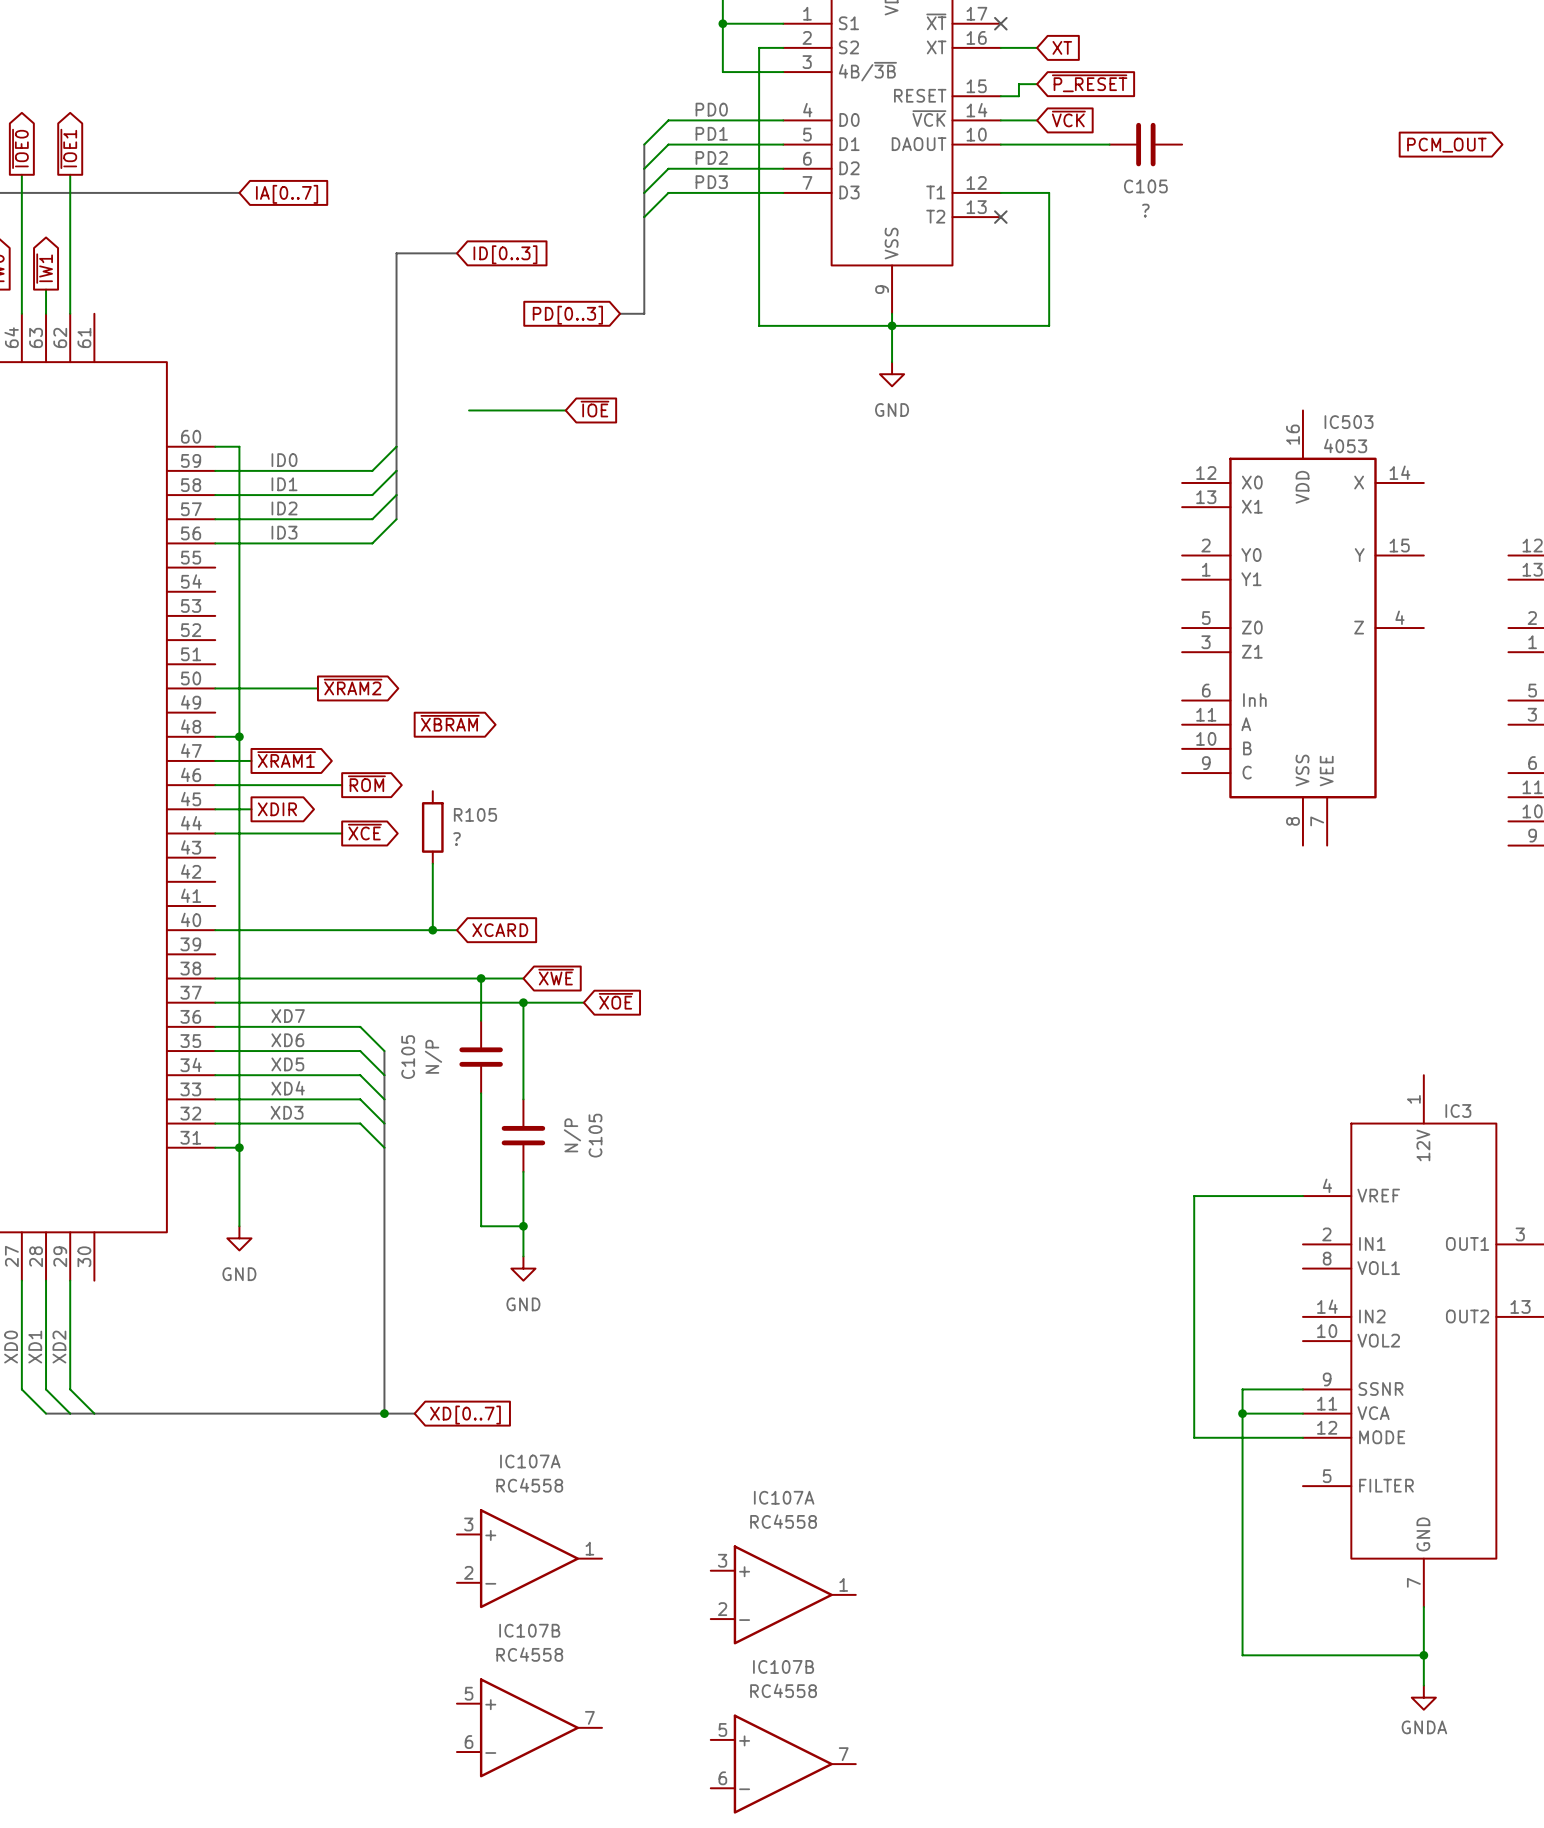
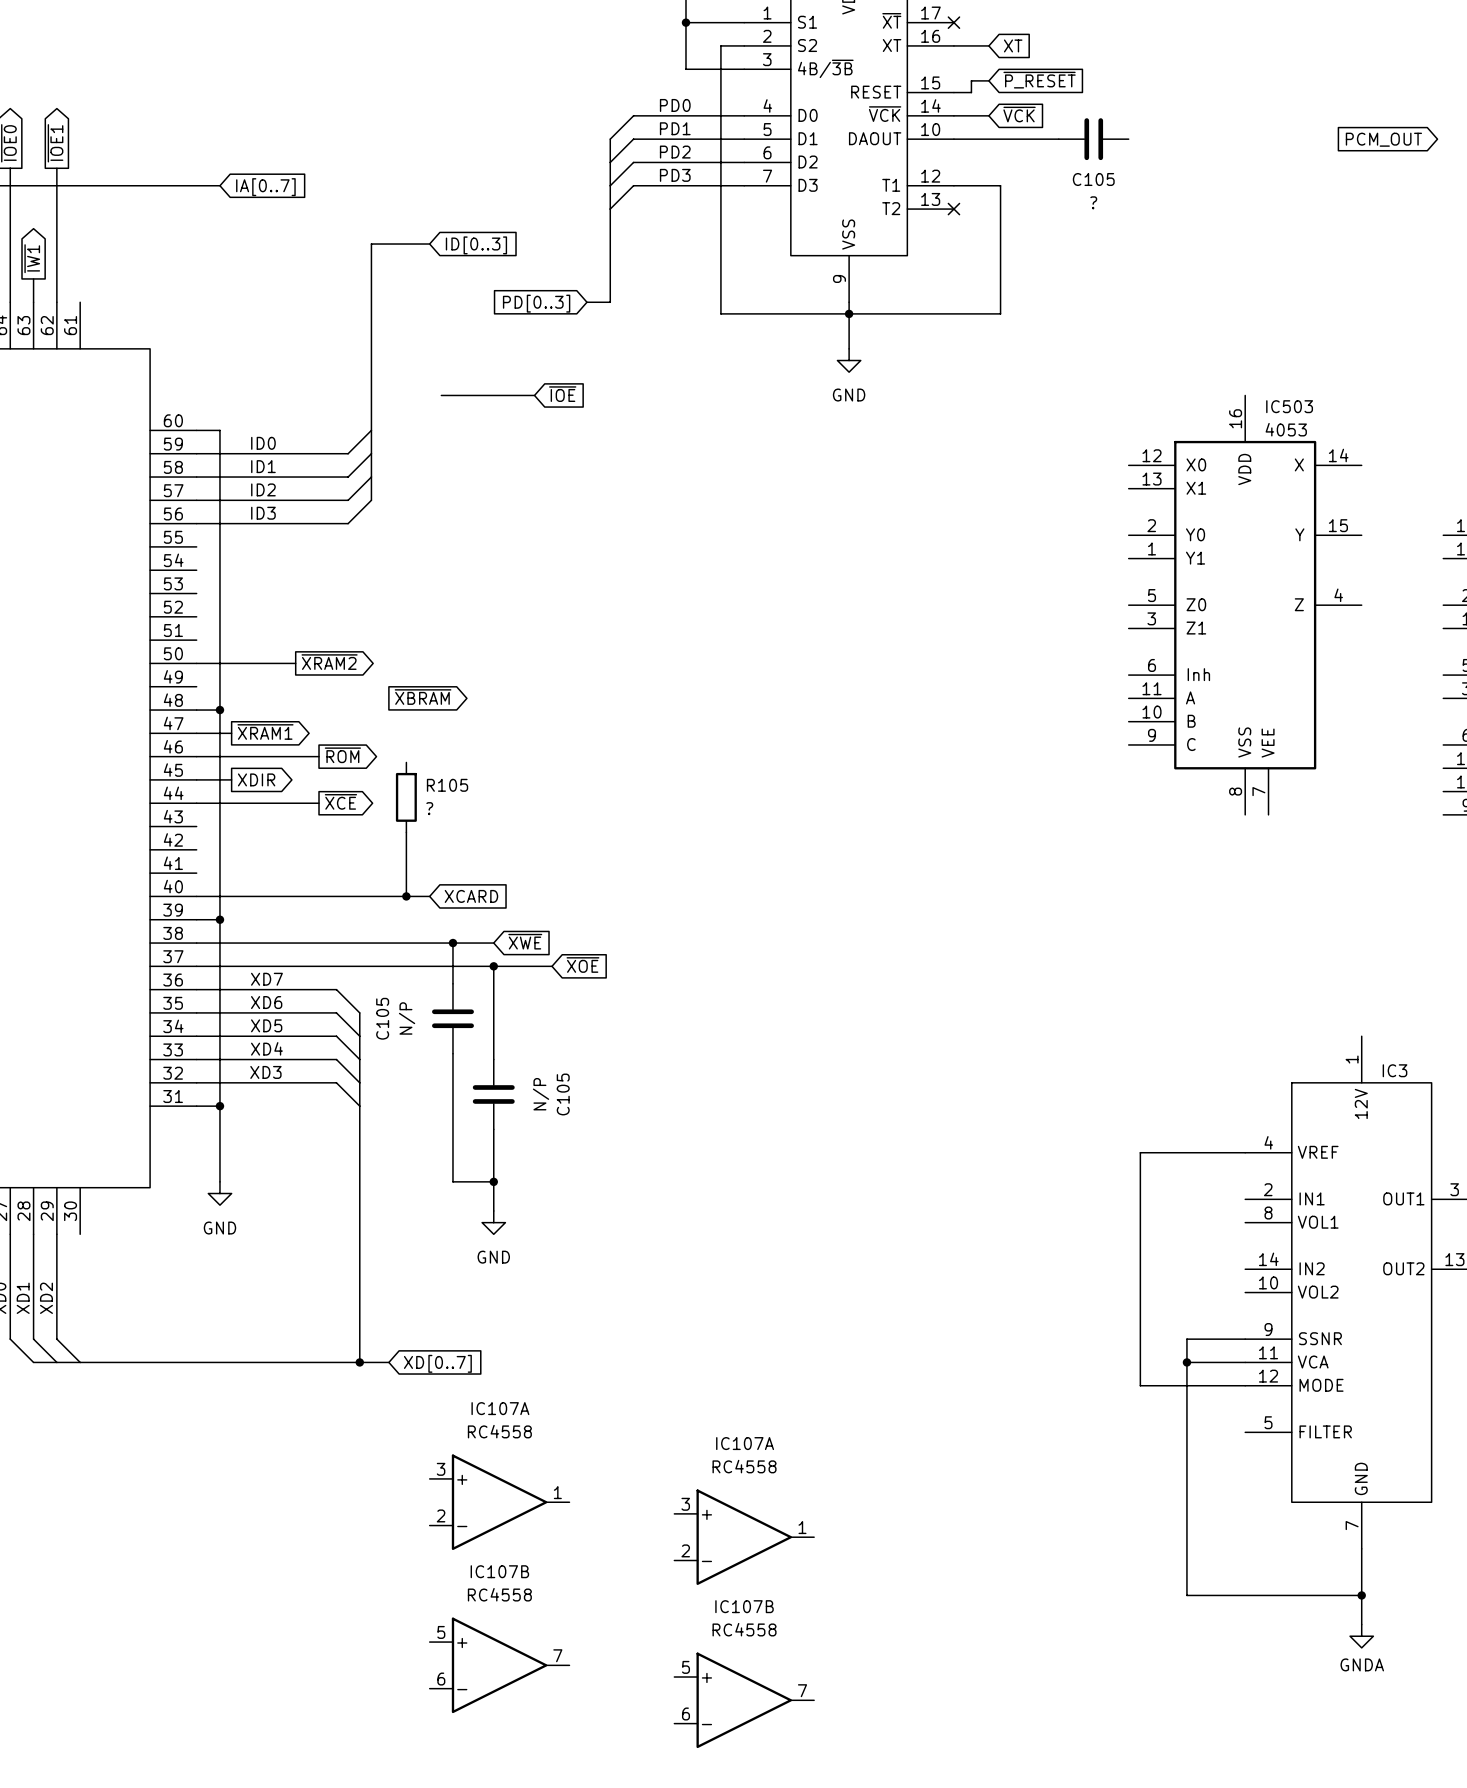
wire: none -> (196, 919) (219, 919)
junction: none -> (219, 919)

